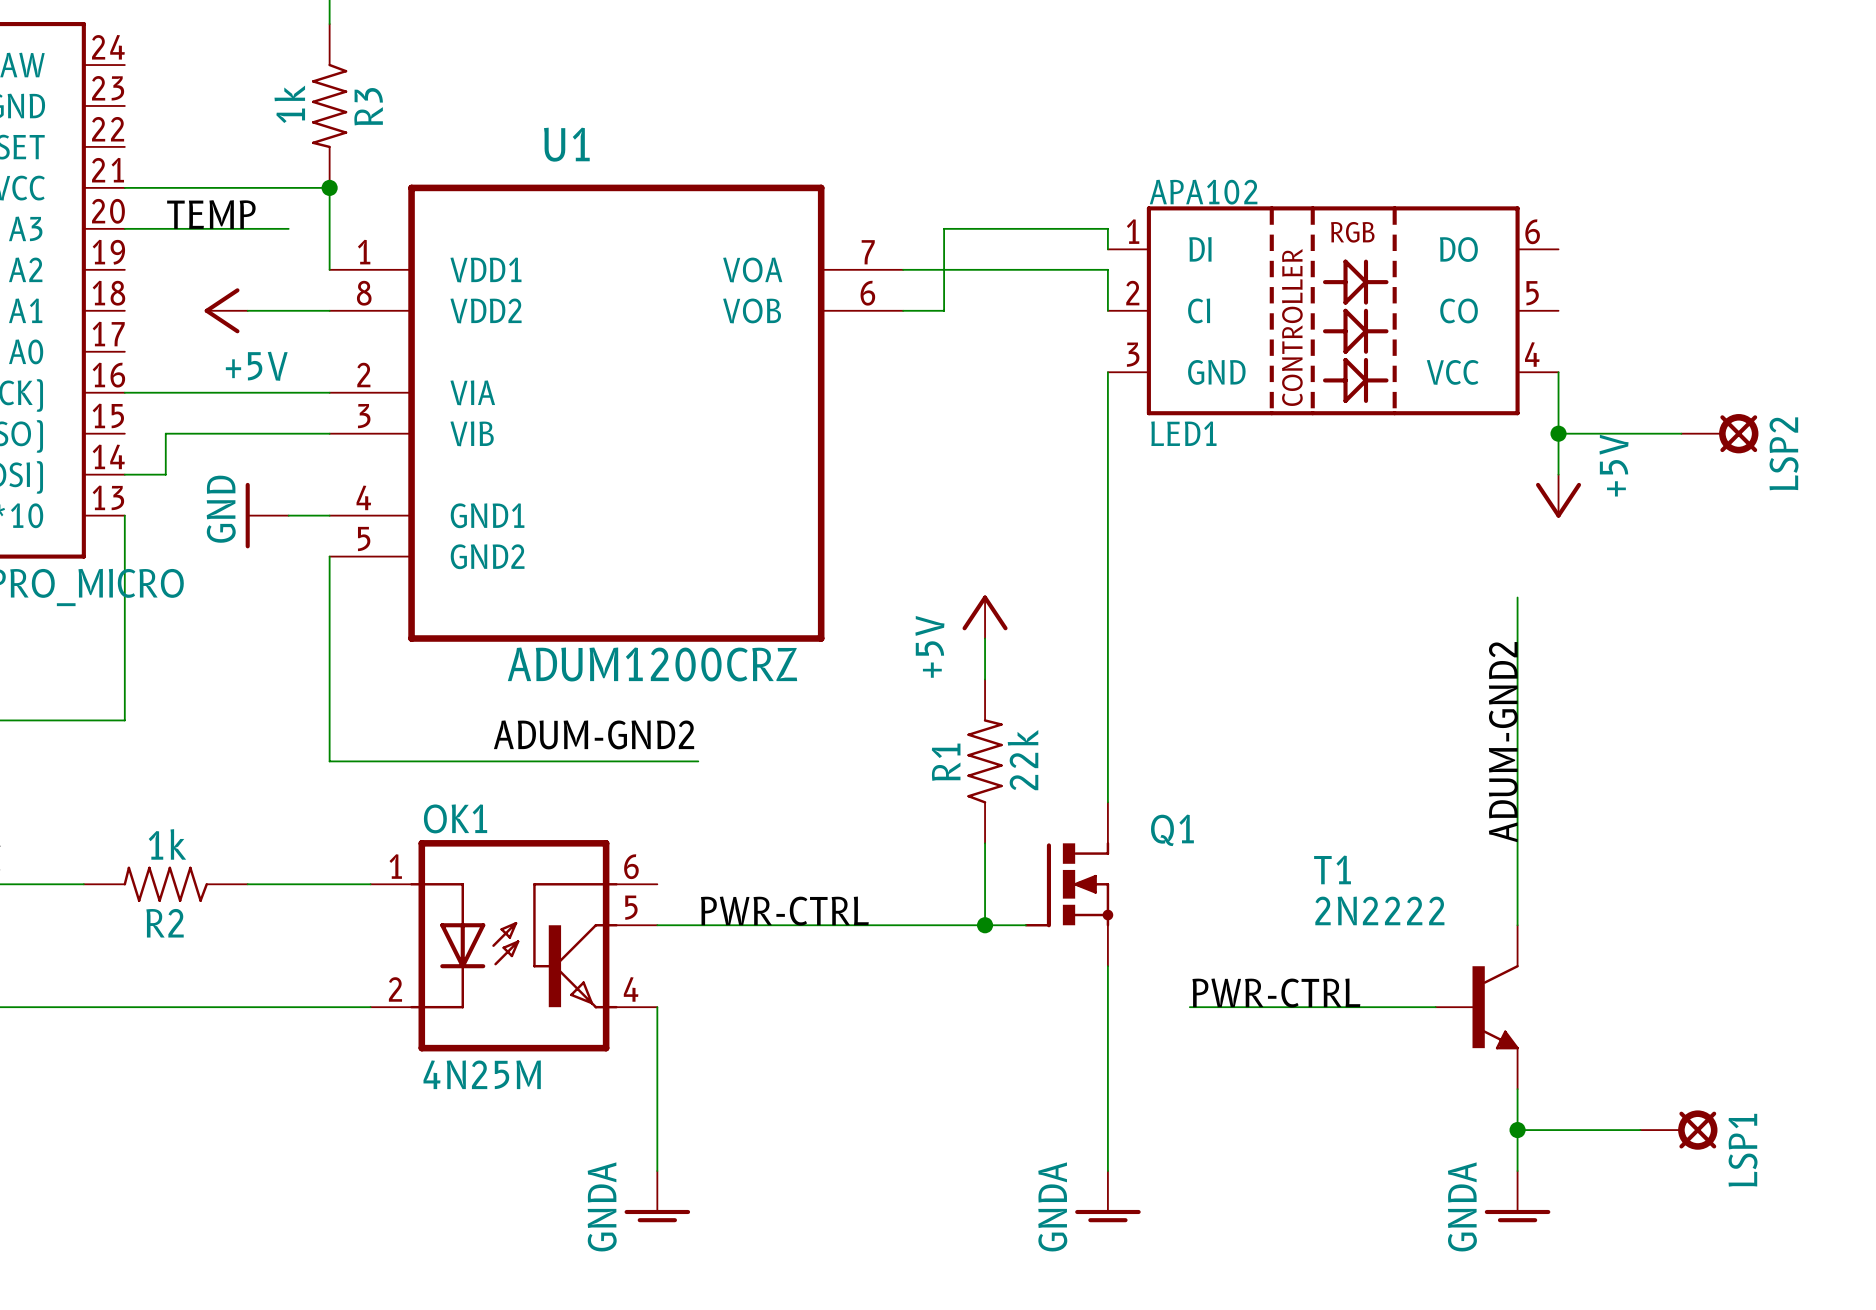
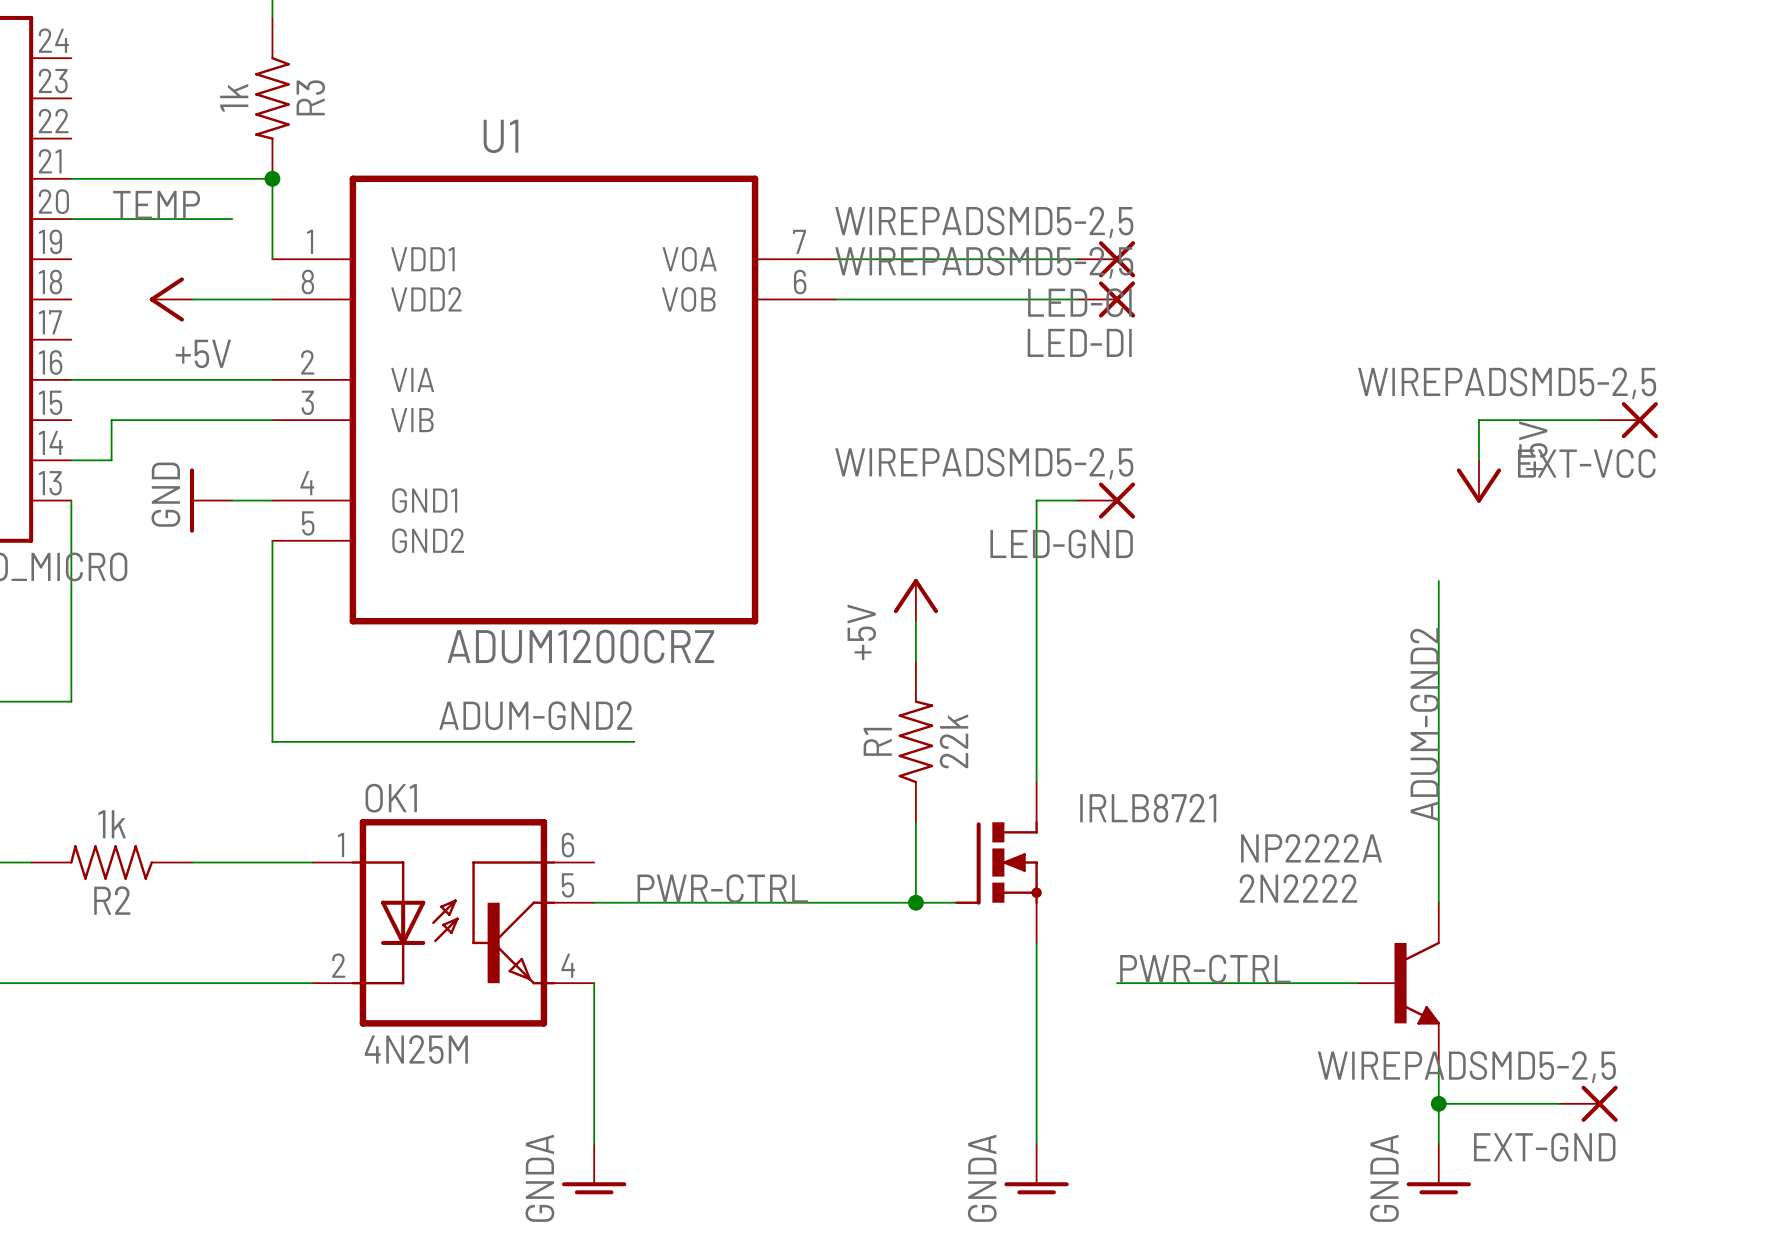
wire: (1107, 249) (1107, 228) (944, 228) (944, 310) -> (1076, 299) (875, 299)
wire: (1107, 269) (1107, 310) -> (1036, 259) (1076, 259)
LED-CI: none -> WIREPADSMD5-2,5 (1105, 259)
LED-DI: none -> WIREPADSMD5-2,5 (1105, 299)
LED1: (1333, 310) -> none
wire: (1107, 372) (1107, 515) -> (1076, 500) (1036, 500)
wire: (1558, 372) (1558, 433) -> none
junction: (1558, 433) -> none
EXT-VCC: none -> WIREPADSMD5-2,5 (1628, 420)
LSP2: (1719, 433) -> none
LED-GND: none -> WIREPADSMD5-2,5 (1105, 500)
Q1 name: Q1 (1172, 830) -> IRLB8721 (1148, 808)
T1 name: T1 (1332, 869) -> NP2222A (1311, 848)
EXT-GND: none -> WIREPADSMD5-2,5 (1588, 1103)
LSP1: (1678, 1130) -> none

